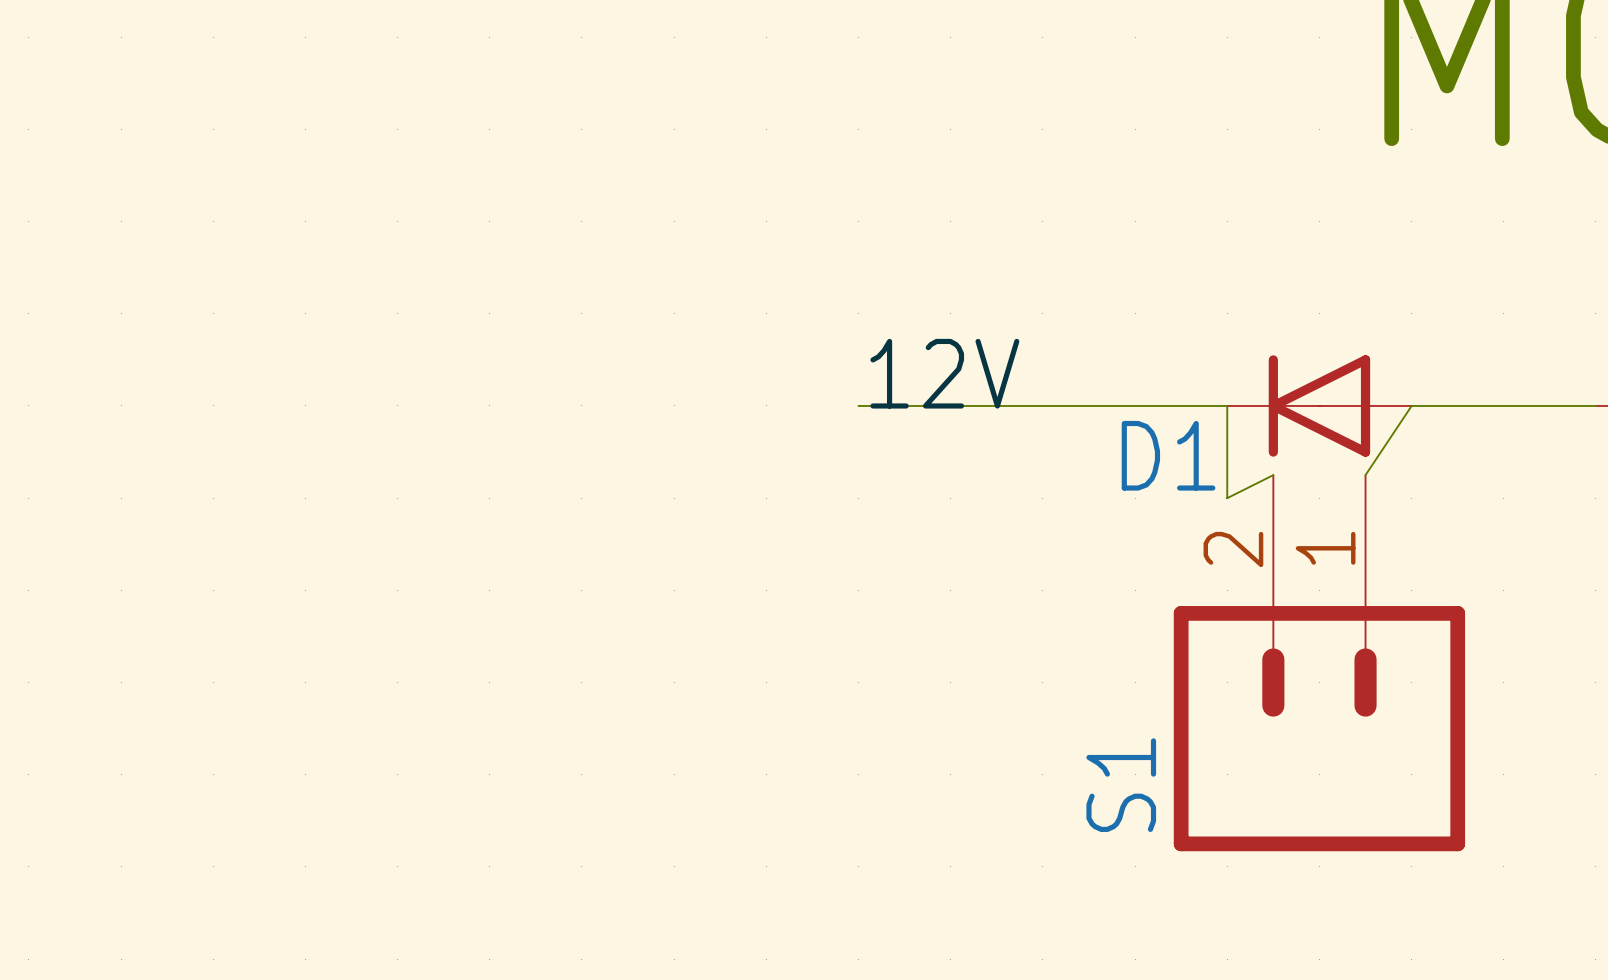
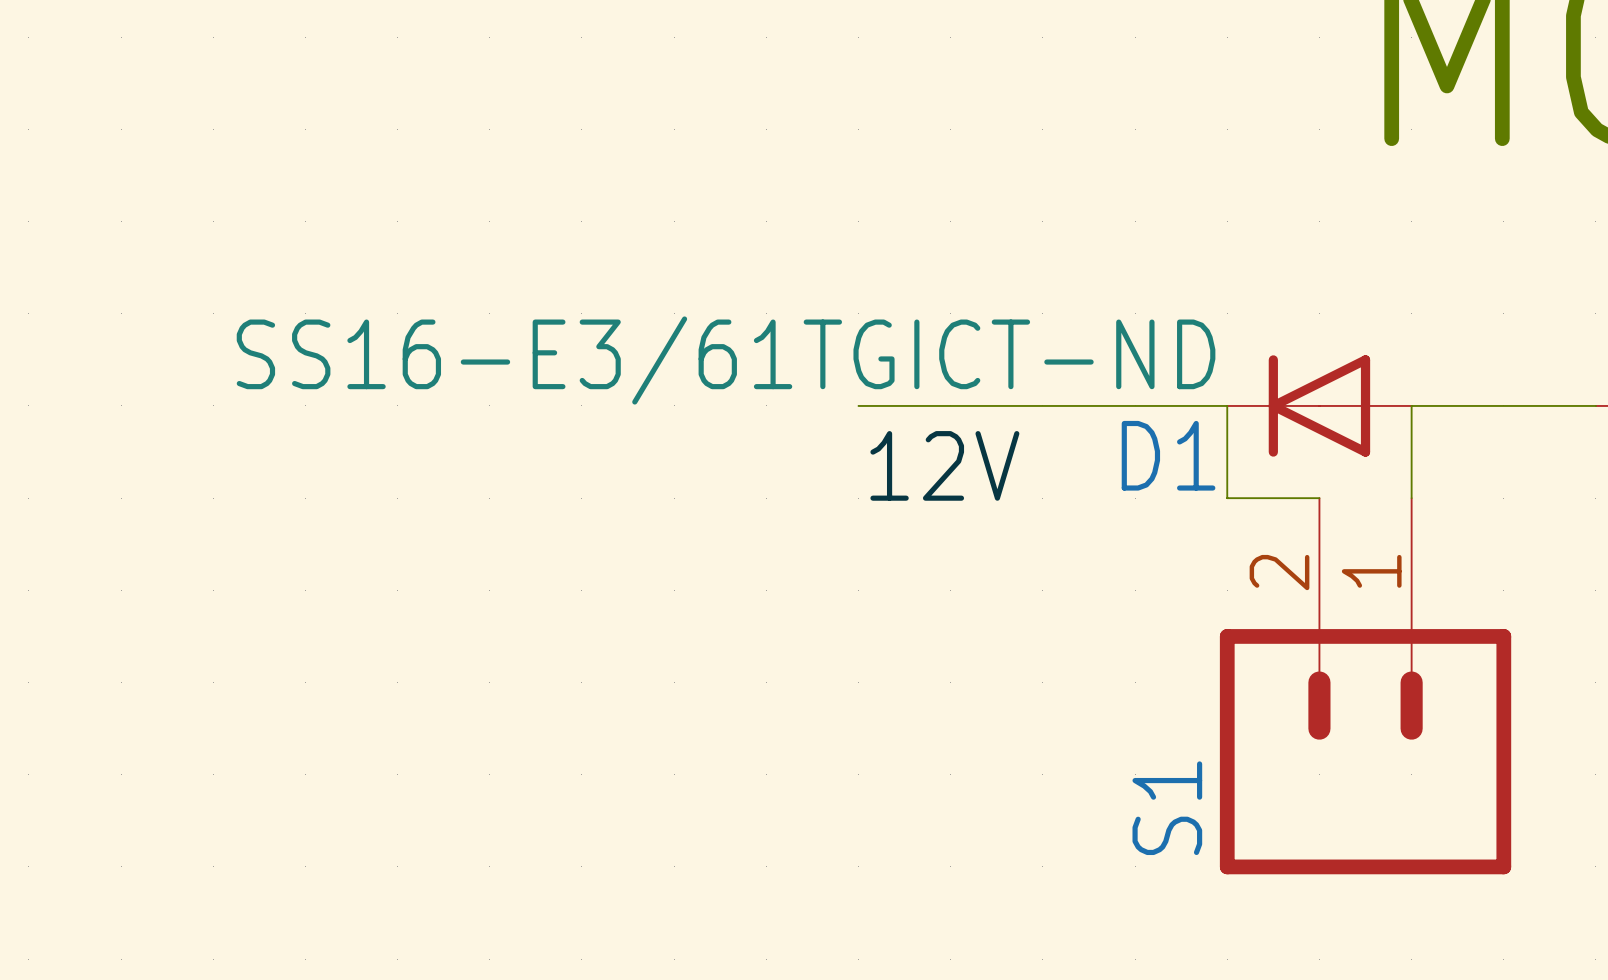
D1 value: none -> SS16-E3/61TGICT-ND (726, 360)
label position: 12V (944, 373) -> 12V (944, 465)
wire: (1411, 405) (1365, 475) -> (1411, 405) (1411, 498)
wire: (1273, 475) (1227, 498) -> (1319, 498) (1227, 498)
S1 position: (1319, 663) -> (1365, 686)

